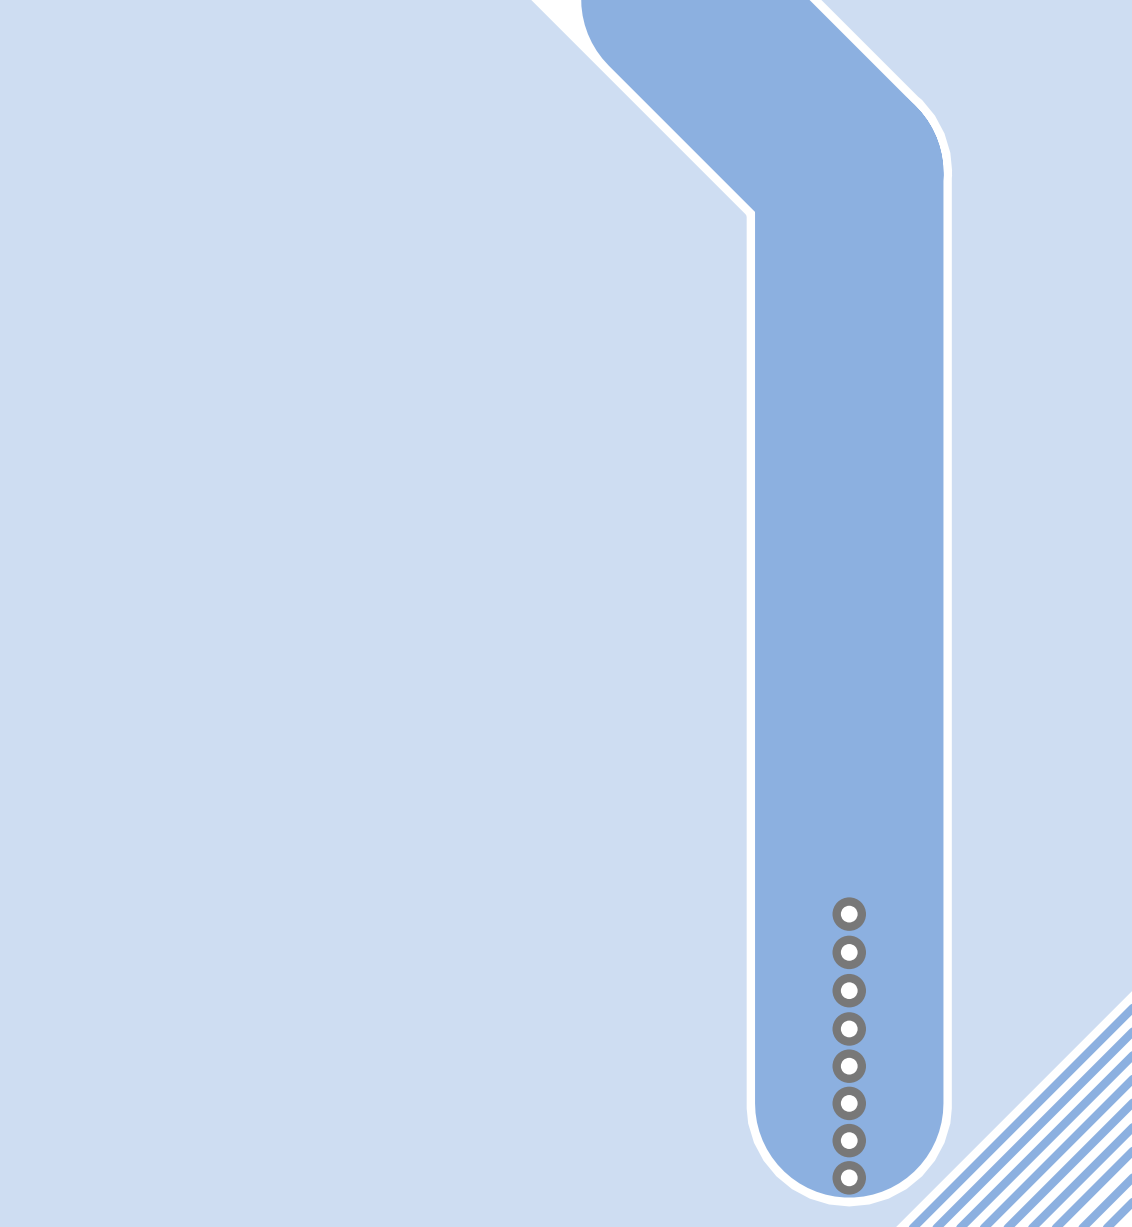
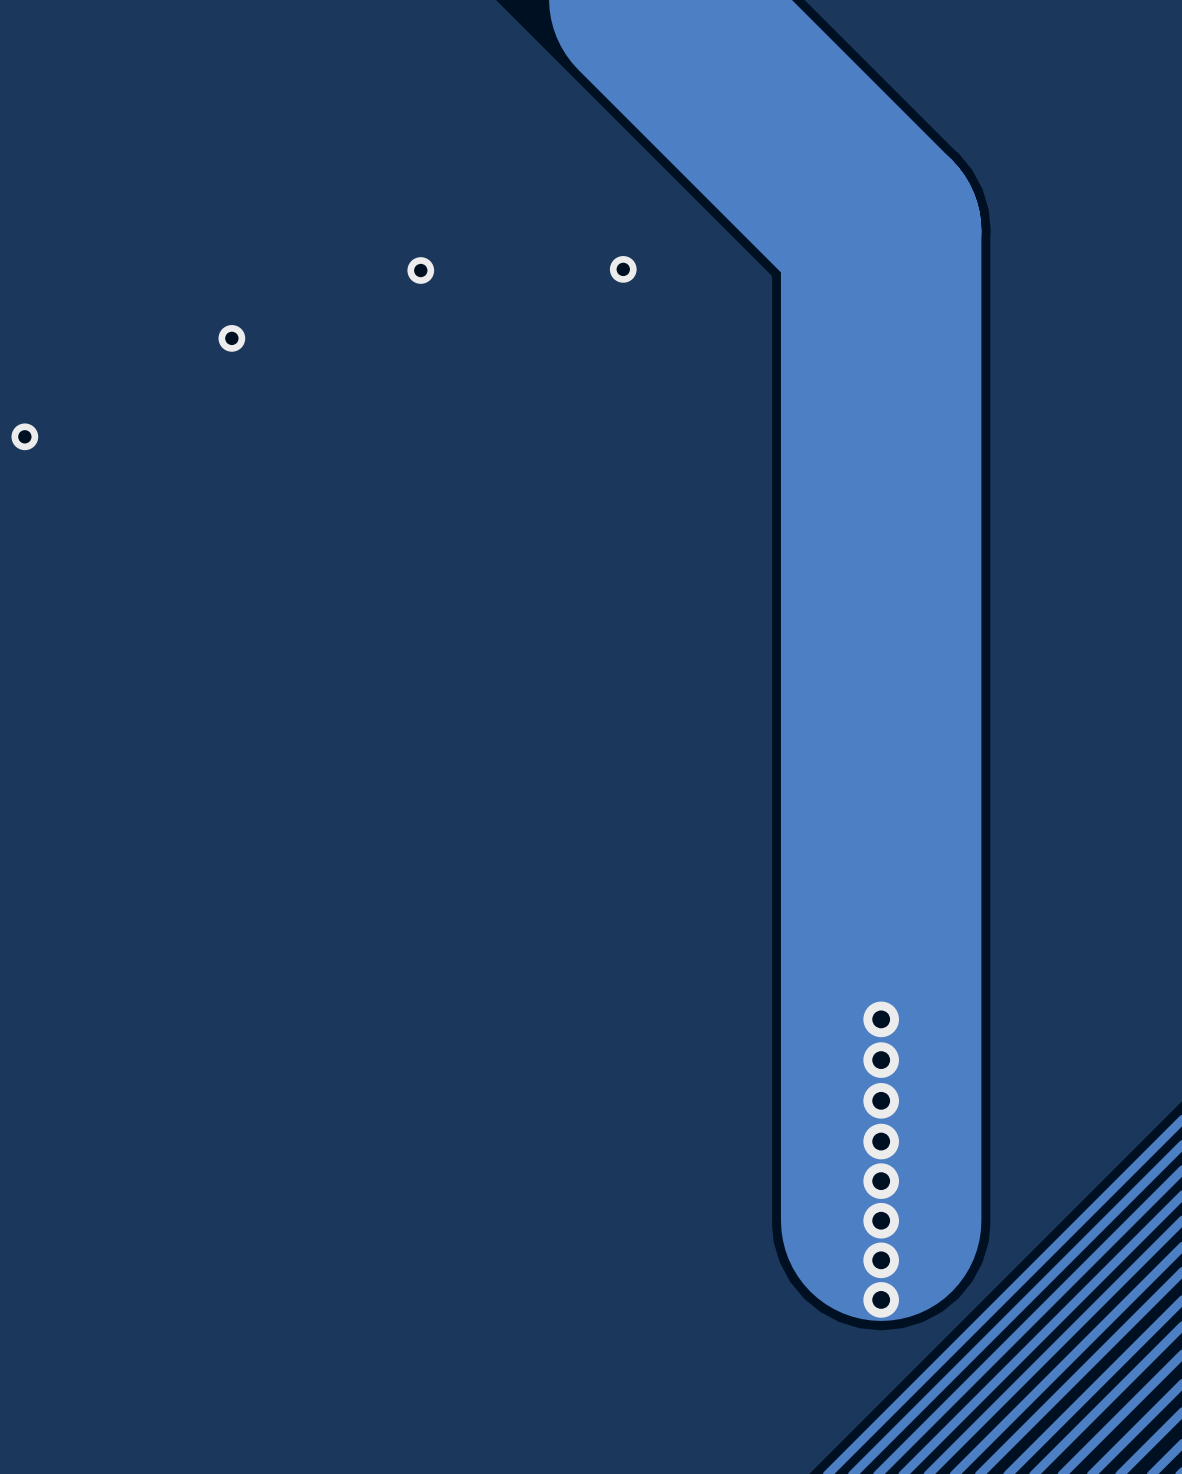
via: none -> (623, 269)
via: none -> (420, 270)
via: none -> (231, 338)
via: none -> (24, 436)

